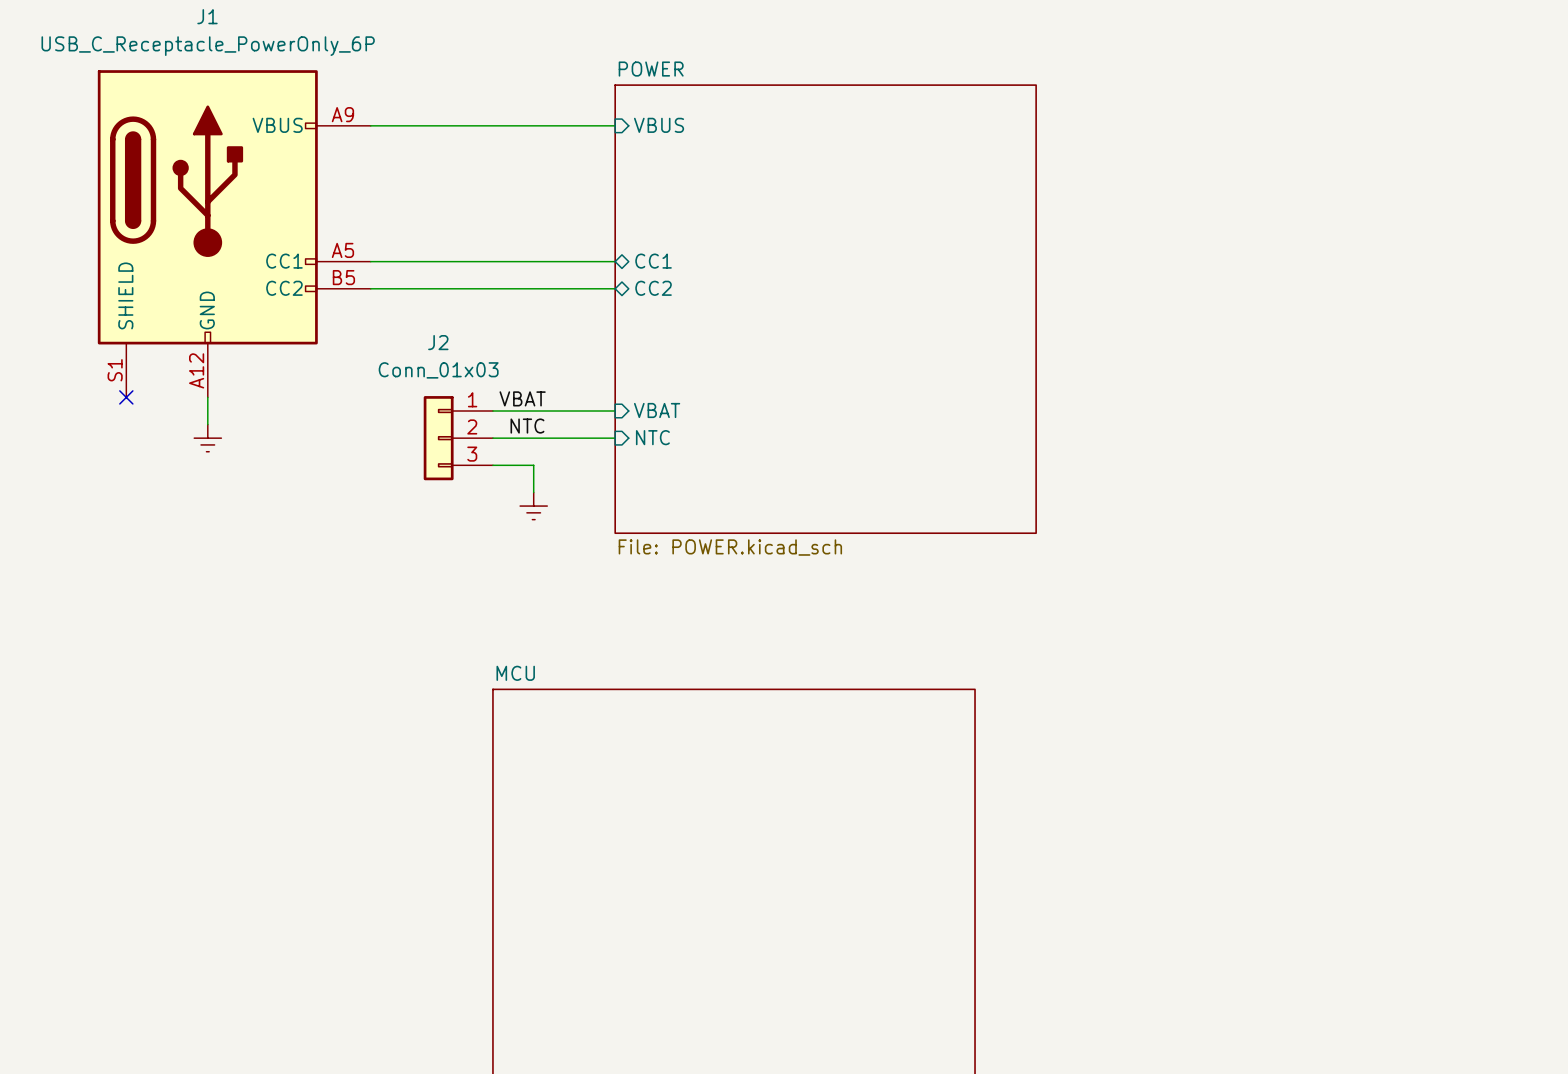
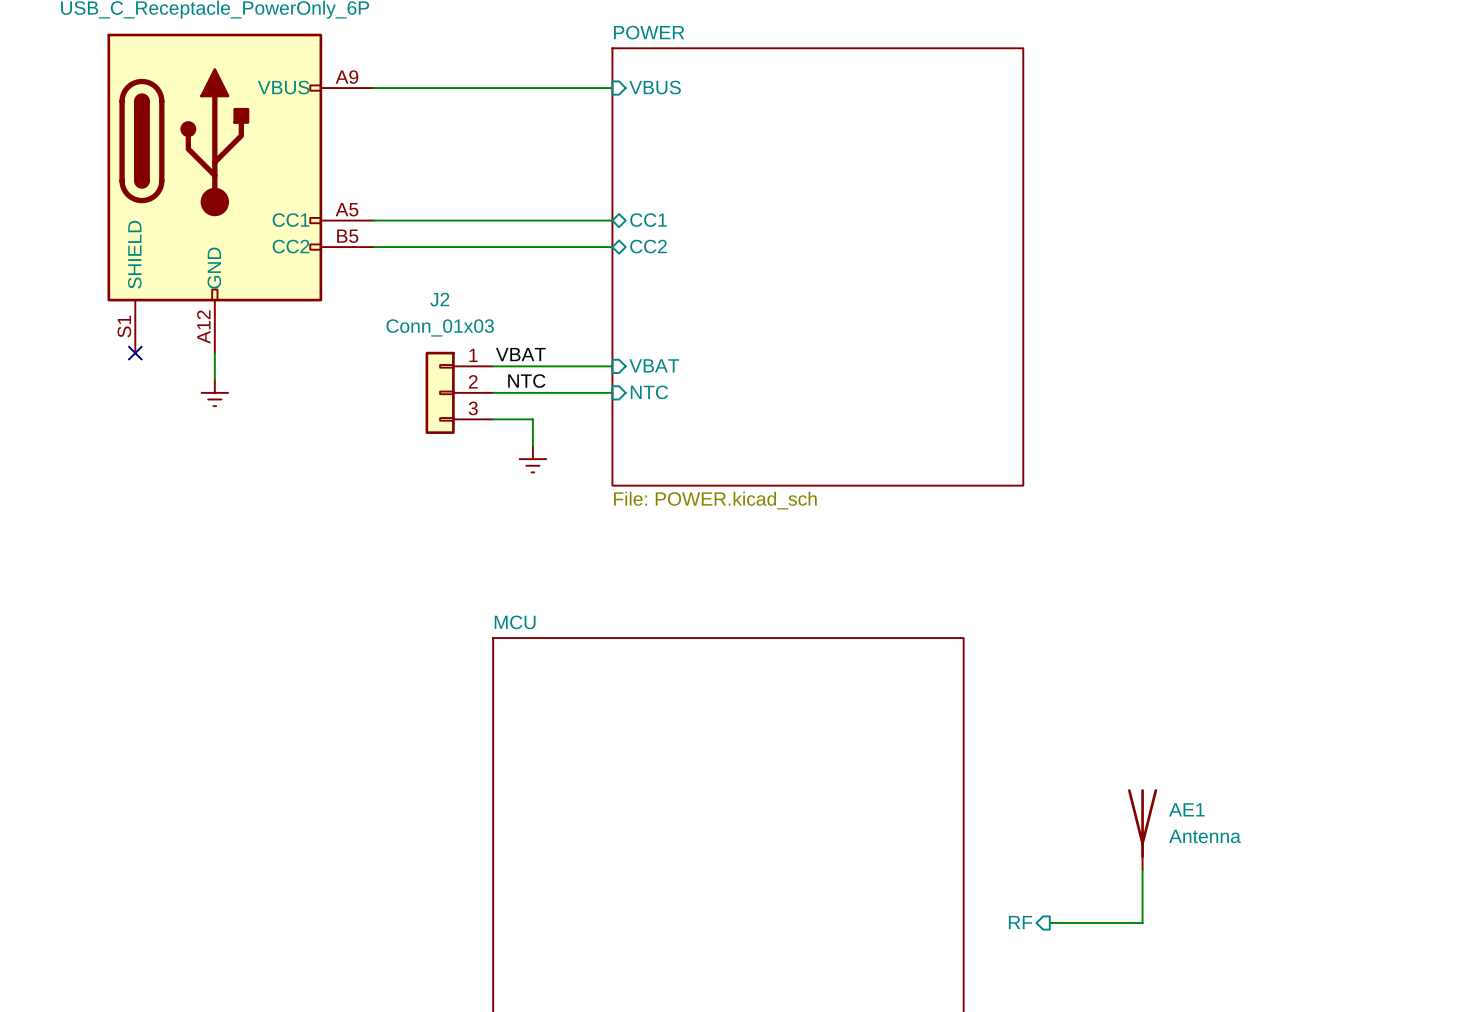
AE1: none -> Antenna (1142, 829)
wire: none -> (1142, 869) (1142, 923) (1049, 923)
sheet pin: none -> RF (1020, 922)

